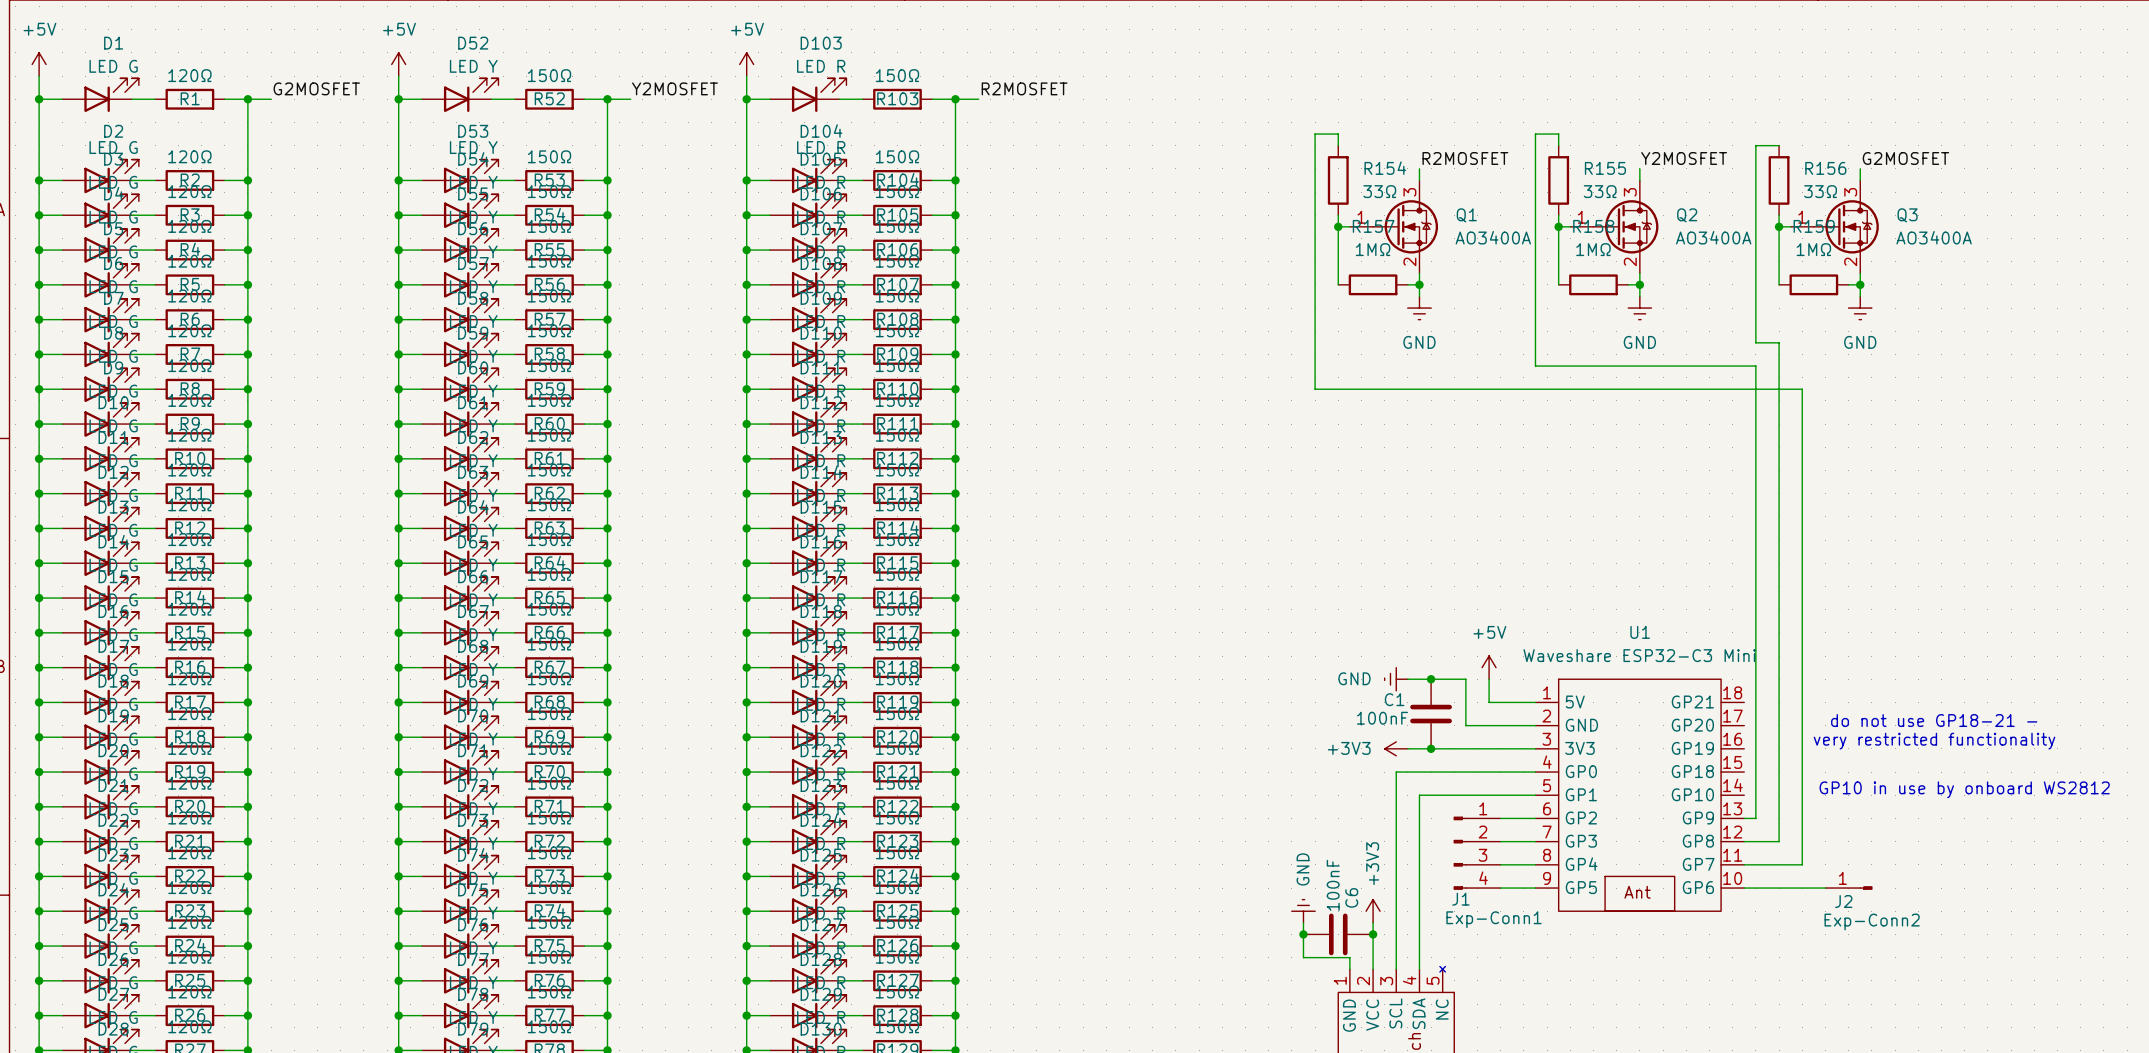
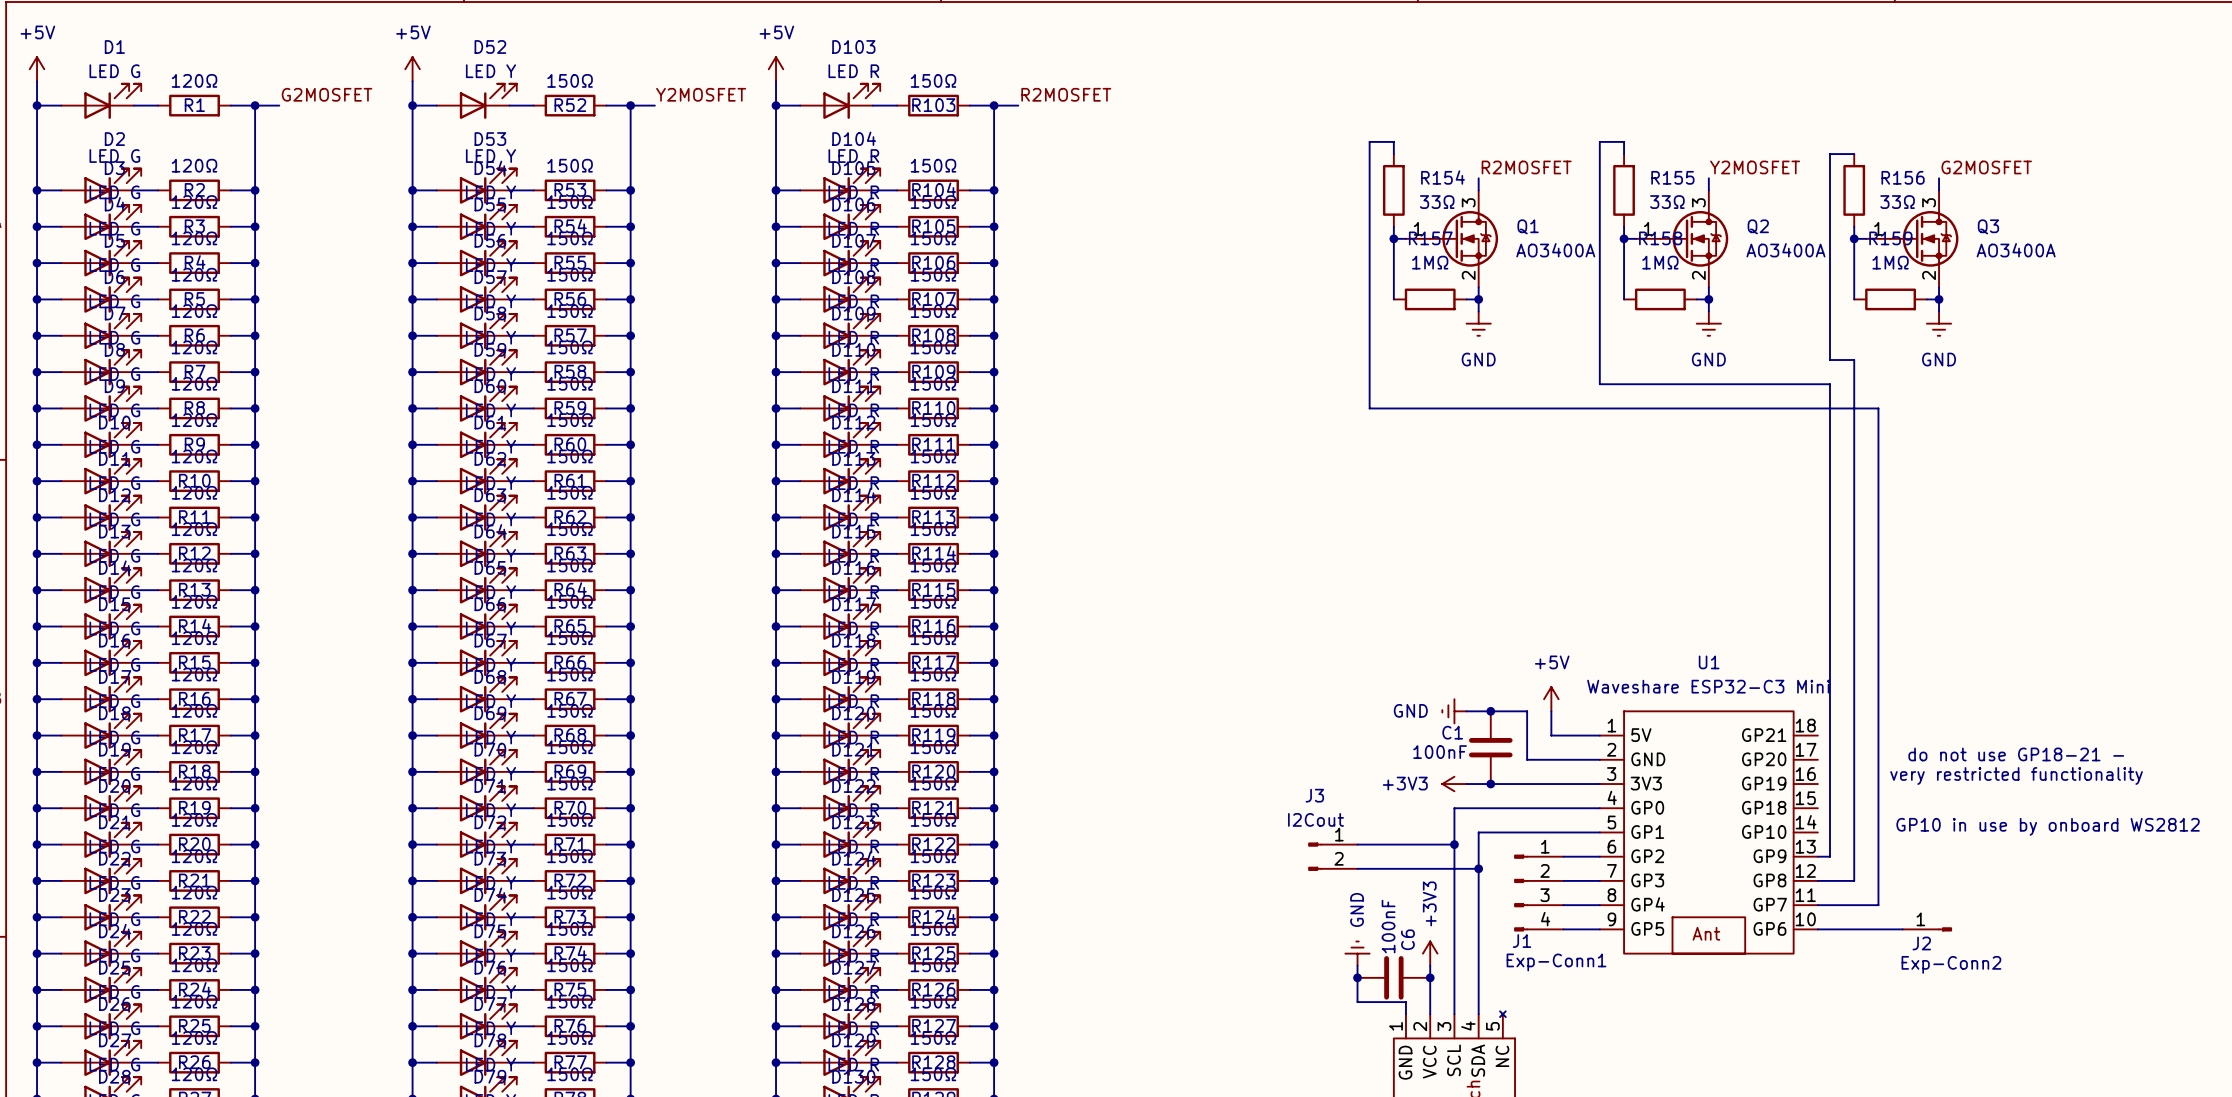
wire: none -> (1357, 844) (1454, 844)
junction: none -> (1454, 844)
J3: none -> I2Cout (1332, 856)
wire: none -> (1357, 868) (1478, 868)
junction: none -> (1478, 868)

